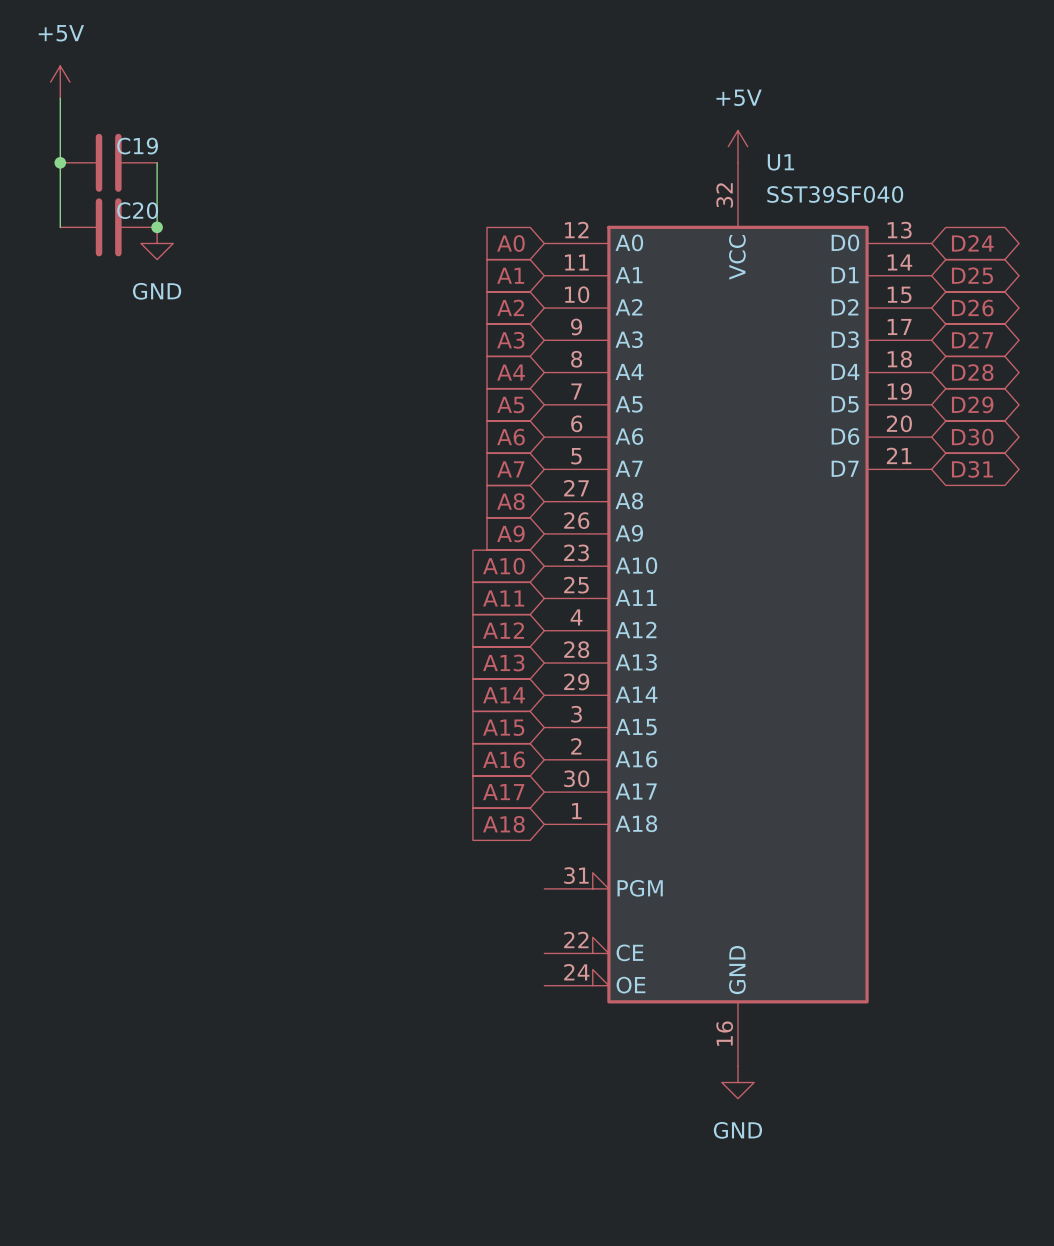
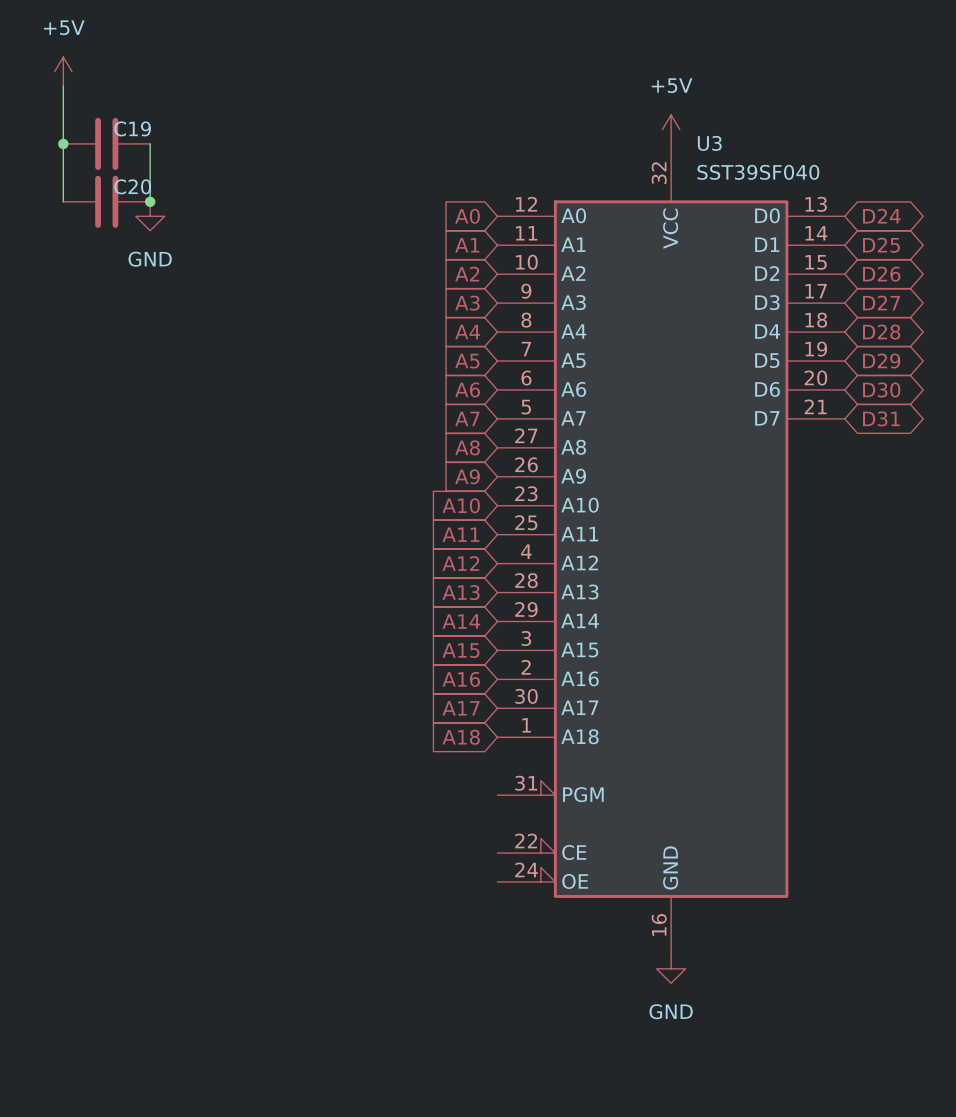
U1 name: U1 (780, 162) -> U3 (709, 143)

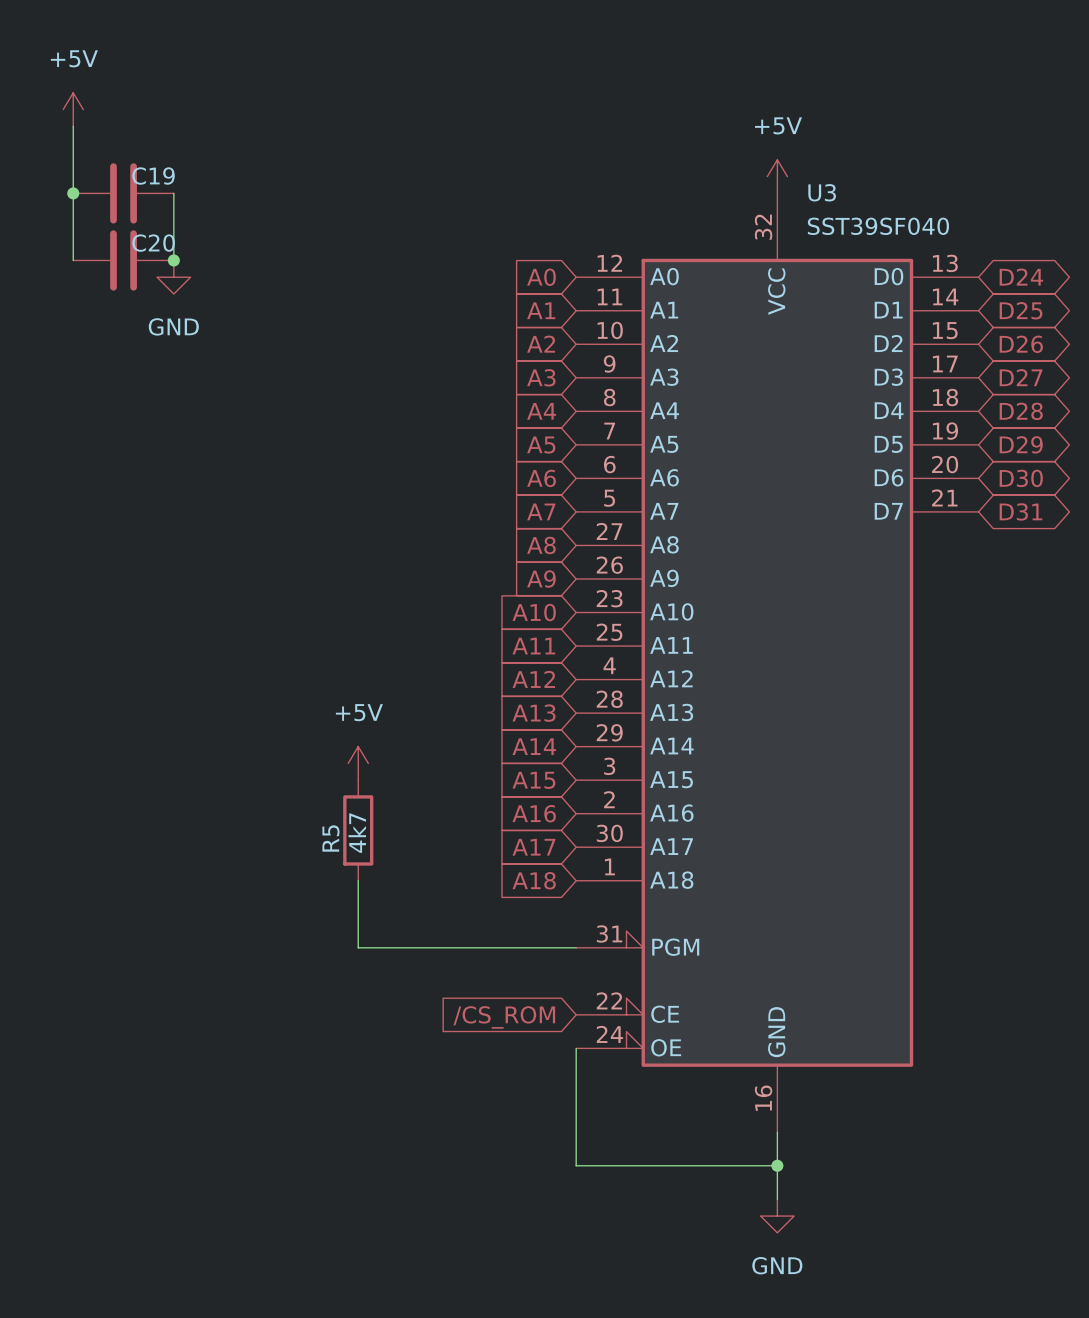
power symbol: none -> +5V (358, 763)
R5: none -> 4k7 (358, 830)
wire: none -> (358, 880) (358, 947) (576, 947)
global label: none -> /CS_ROM (504, 1017)
wire: none -> (576, 1048) (576, 1165) (777, 1165)
wire: none -> (777, 1132) (777, 1199)
power symbol position: GND (671, 968) -> GND (777, 1216)
junction: none -> (777, 1165)

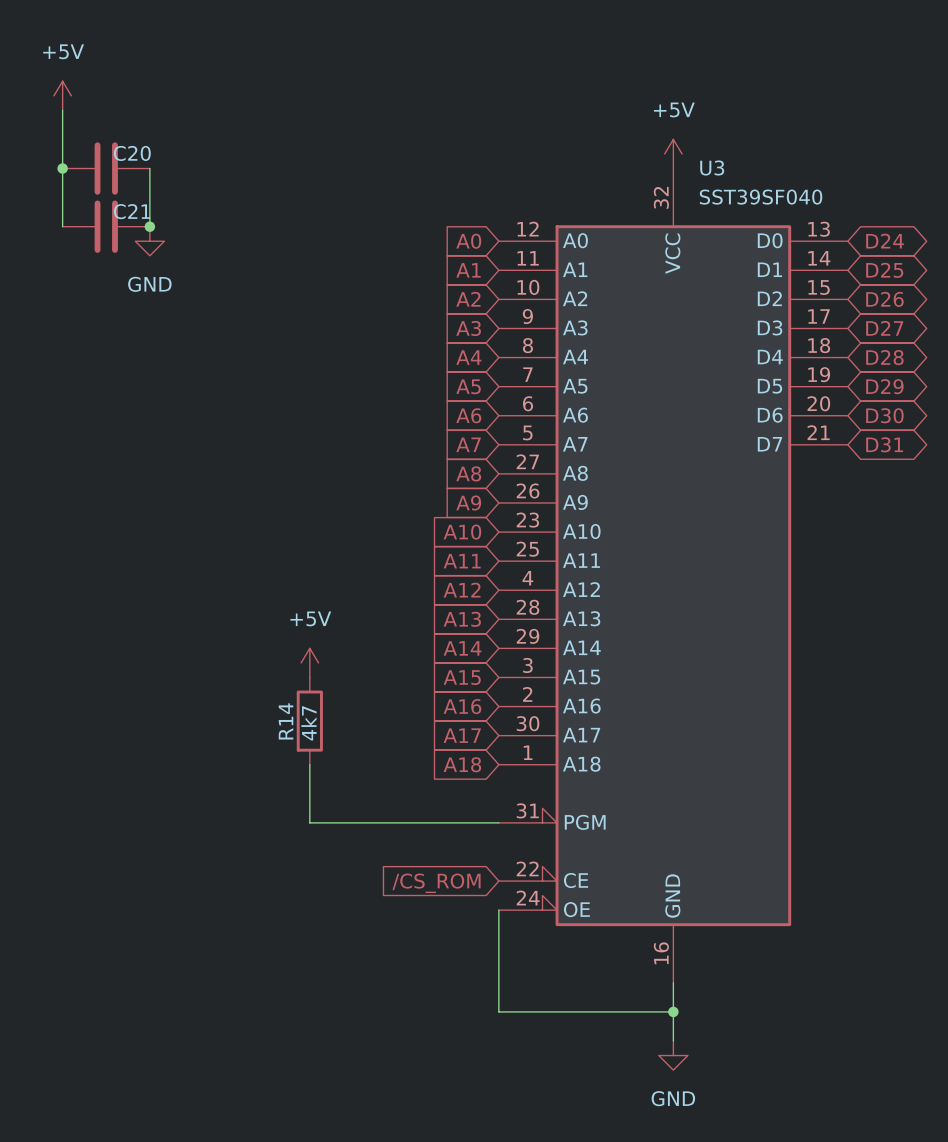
C19 name: C19 (153, 176) -> C20 (132, 153)
C20 name: C20 (153, 243) -> C21 (132, 211)
R5 name: R5 (330, 838) -> R14 (286, 721)

